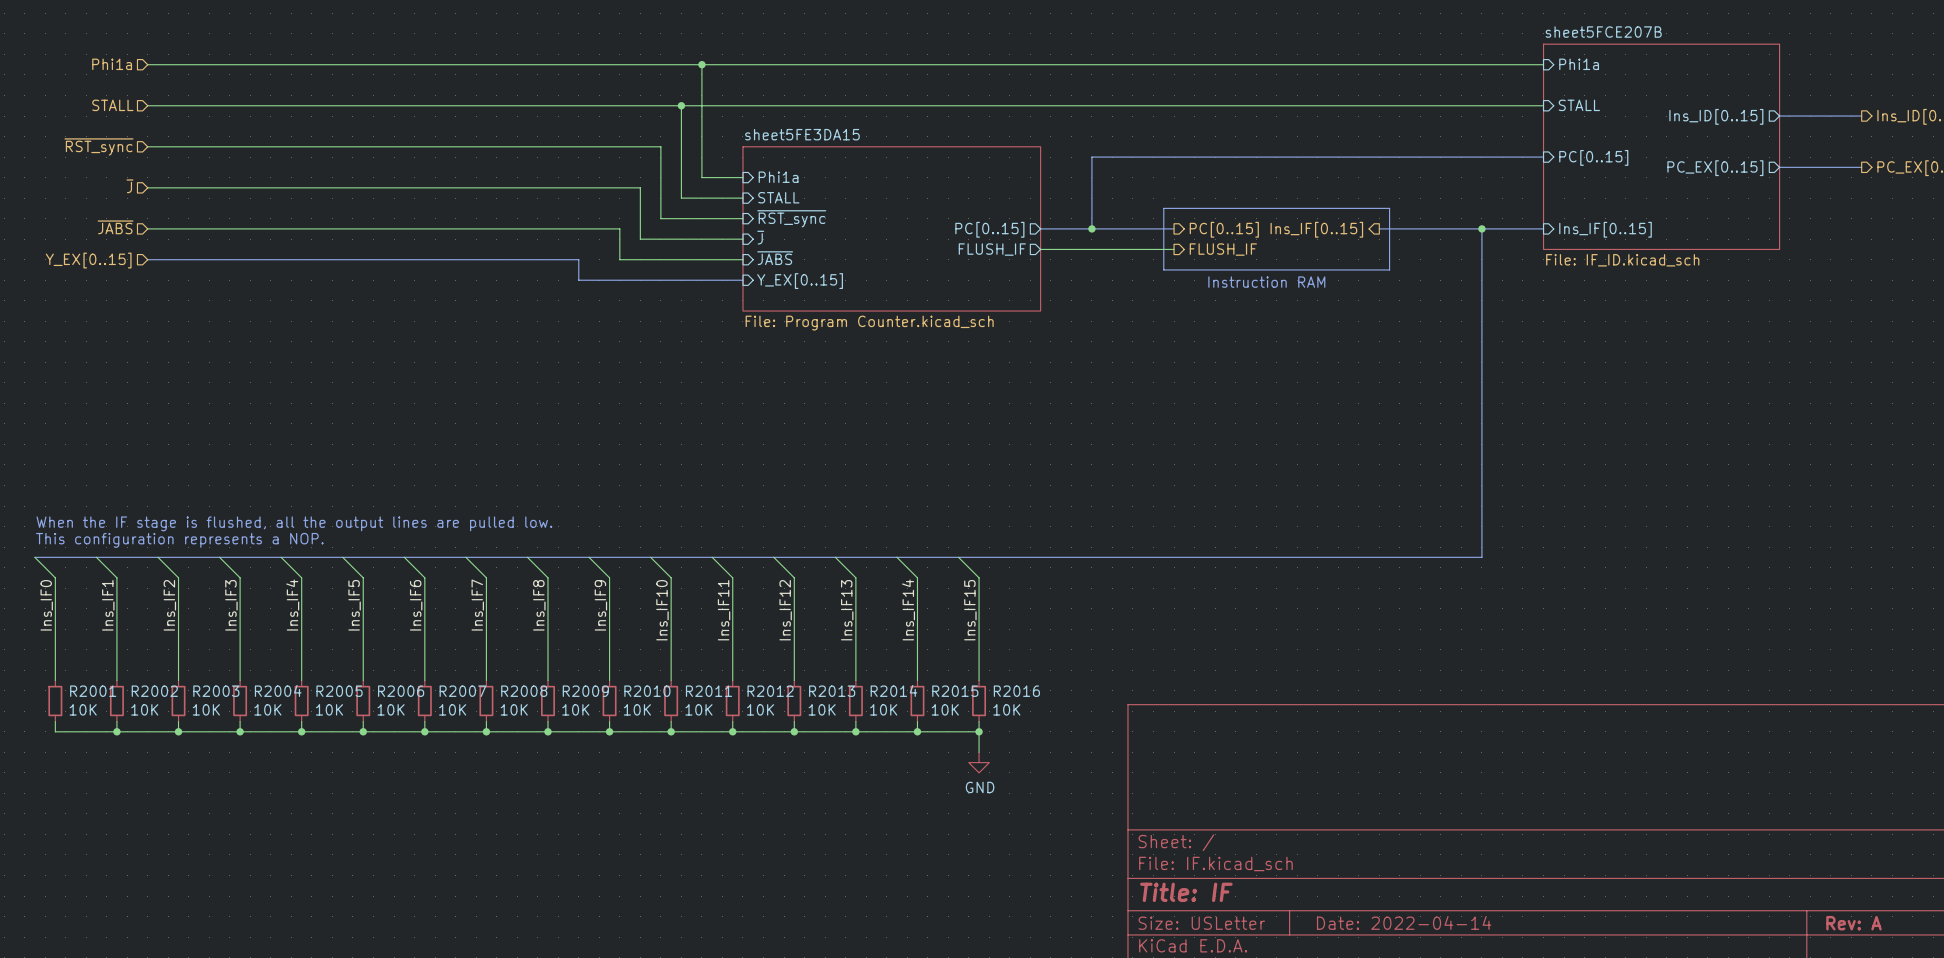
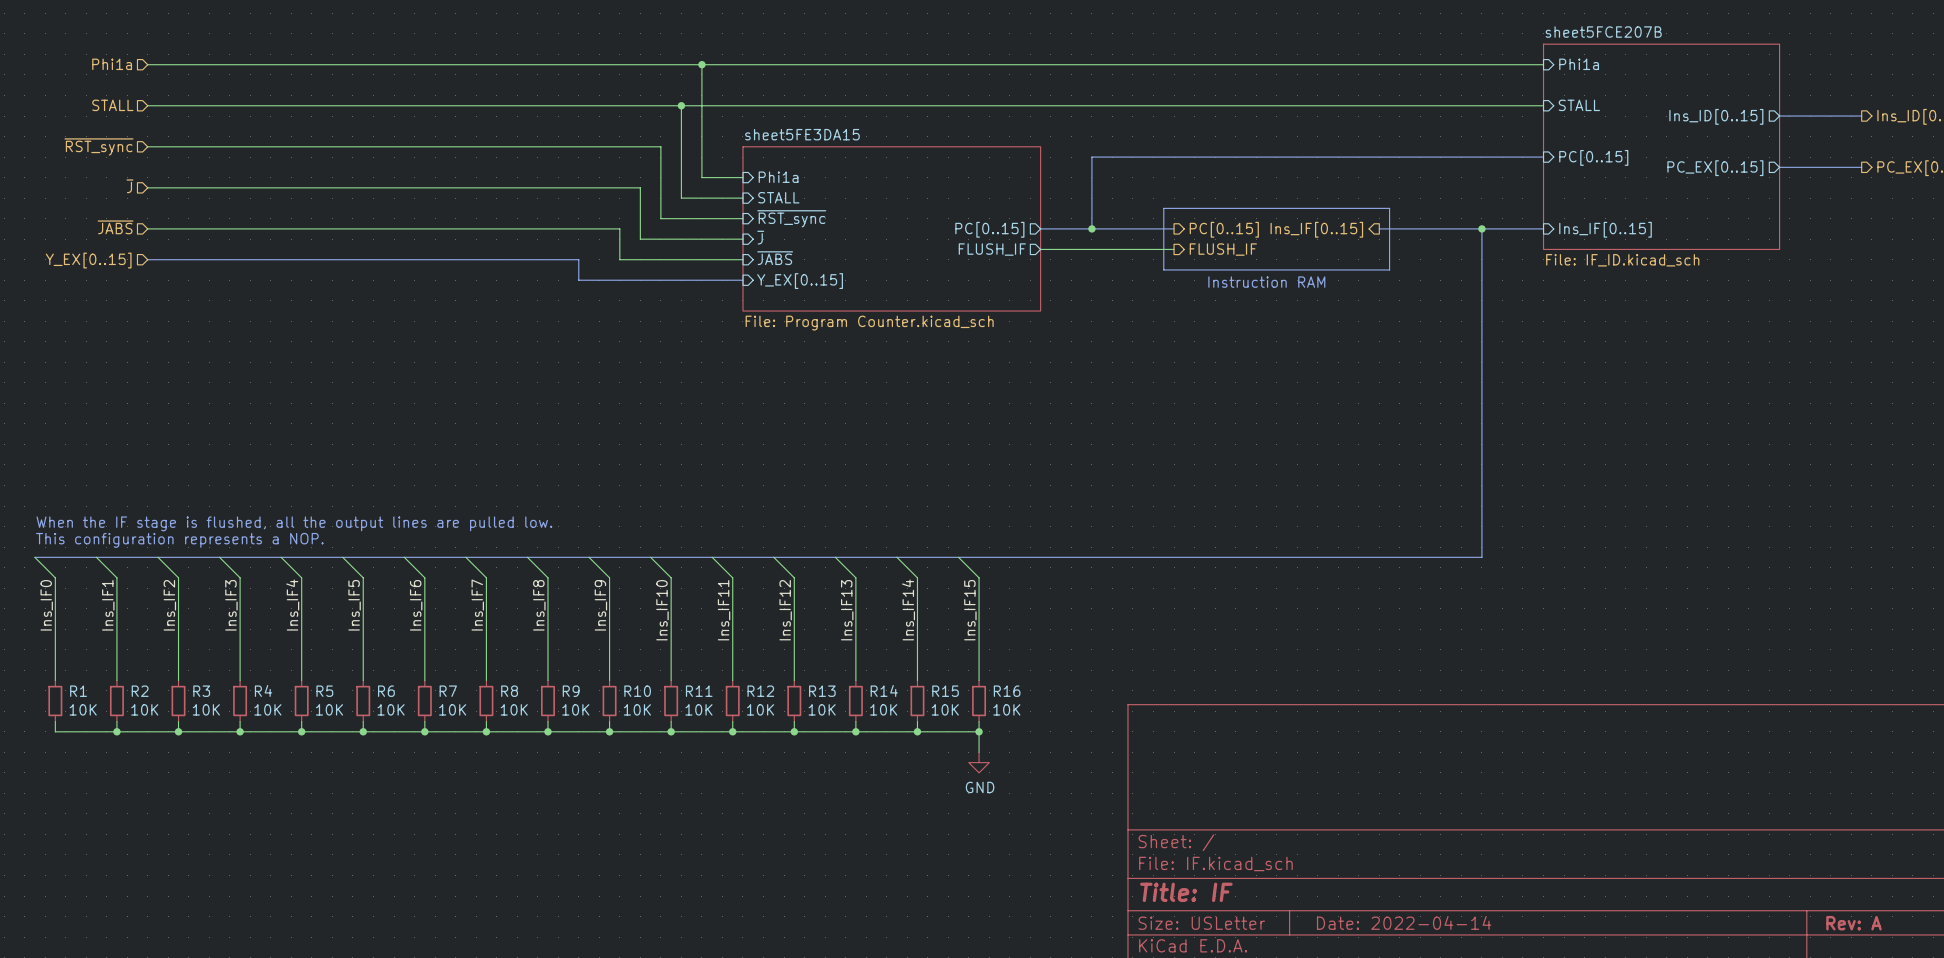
R2004 name: R2004 (278, 690) -> R4 (263, 690)
R2014 name: R2014 (893, 690) -> R14 (884, 690)
R2001 name: R2001 (93, 691) -> R1 (78, 691)
R2002 name: R2002 (154, 691) -> R2 (140, 691)
R2003 name: R2003 (216, 691) -> R3 (201, 691)
R2005 name: R2005 (339, 691) -> R5 (324, 691)
R2006 name: R2006 (401, 691) -> R6 (386, 691)
R2007 name: R2007 (462, 691) -> R7 (448, 691)
R2008 name: R2008 (524, 691) -> R8 (509, 691)
R2009 name: R2009 (585, 691) -> R9 (571, 691)
R2010 name: R2010 (647, 691) -> R10 (637, 691)
R2011 name: R2011 (708, 691) -> R11 (699, 691)
R2012 name: R2012 (770, 691) -> R12 (760, 691)
R2013 name: R2013 (832, 691) -> R13 (822, 691)
R2015 name: R2015 (955, 691) -> R15 (945, 691)
R2016 name: R2016 (1016, 691) -> R16 (1007, 691)

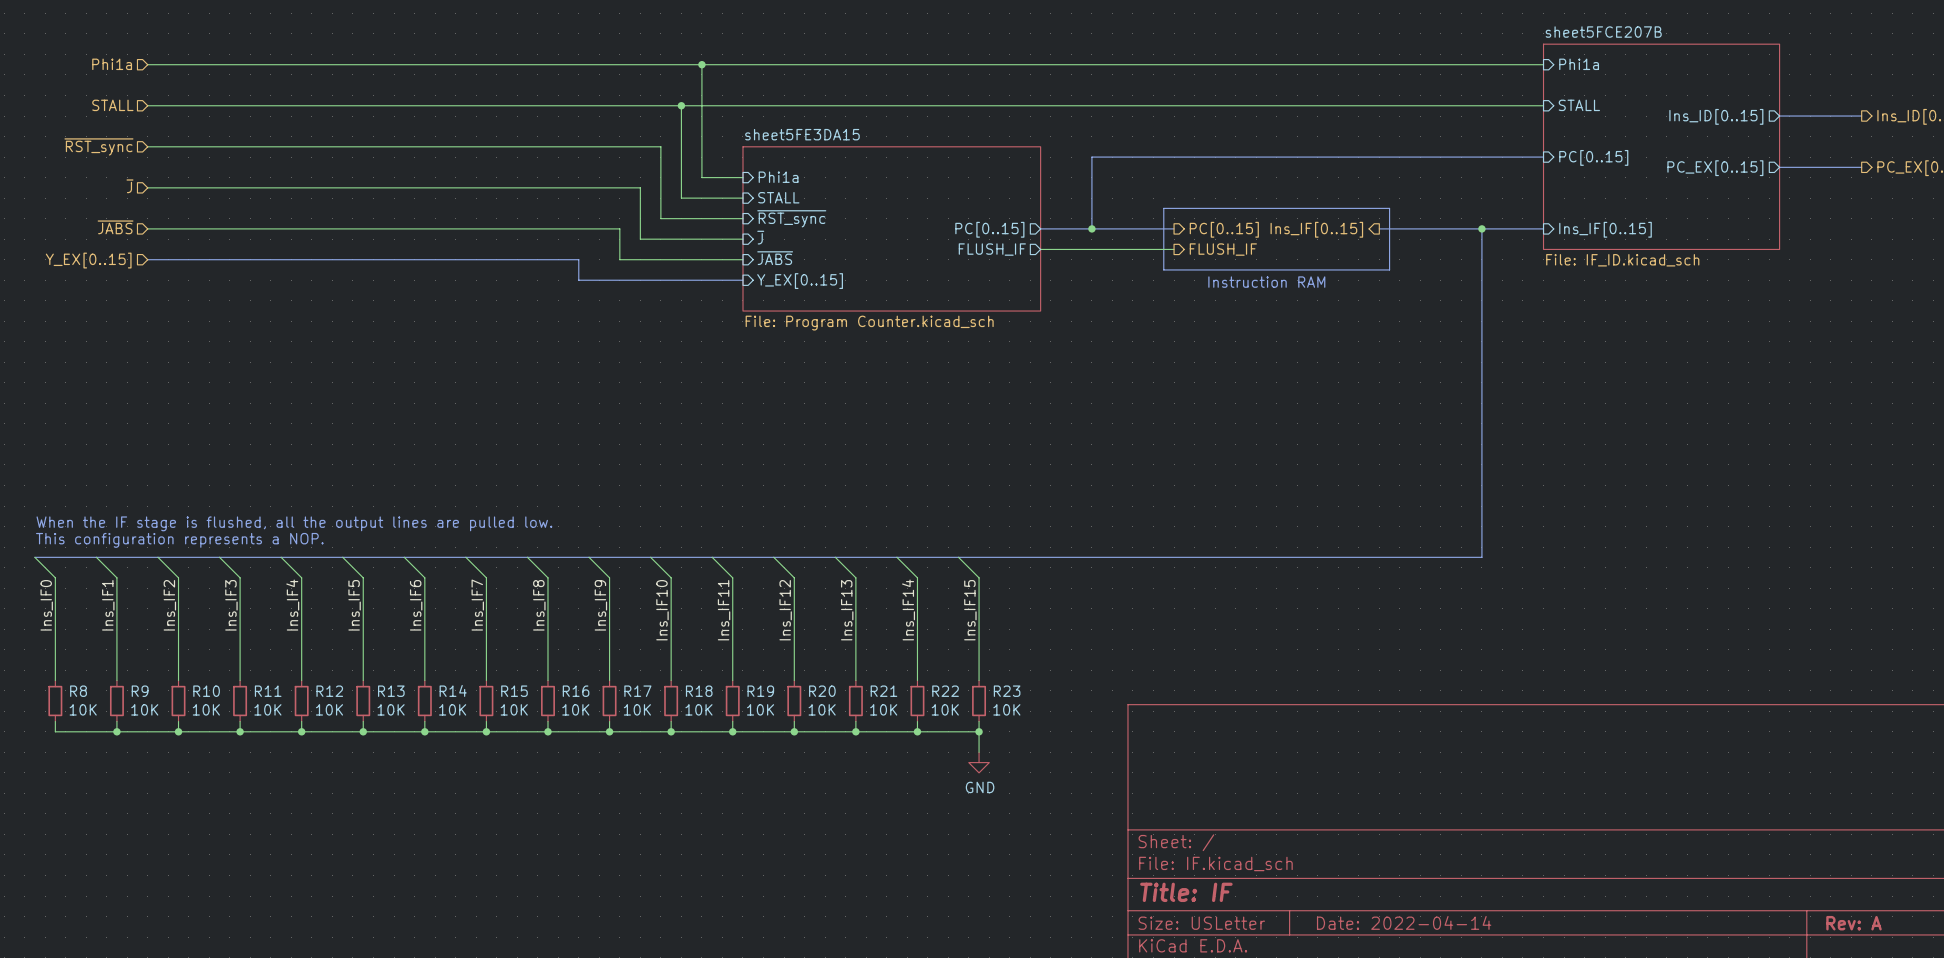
R4 name: R4 (263, 690) -> R11 (268, 691)
R14 name: R14 (884, 690) -> R21 (883, 691)
R1 name: R1 (78, 691) -> R8 (78, 691)
R2 name: R2 (140, 691) -> R9 (140, 691)
R3 name: R3 (201, 691) -> R10 (206, 691)
R5 name: R5 (324, 691) -> R12 (329, 691)
R6 name: R6 (386, 691) -> R13 (391, 691)
R7 name: R7 (448, 691) -> R14 (453, 690)
R8 name: R8 (509, 691) -> R15 (514, 691)
R9 name: R9 (571, 691) -> R16 (576, 691)
R10 name: R10 (637, 691) -> R17 (637, 691)
R11 name: R11 (699, 691) -> R18 (699, 691)
R12 name: R12 (760, 691) -> R19 (760, 691)
R13 name: R13 (822, 691) -> R20 (822, 691)
R15 name: R15 (945, 691) -> R22 (945, 691)
R16 name: R16 (1007, 691) -> R23 (1007, 691)

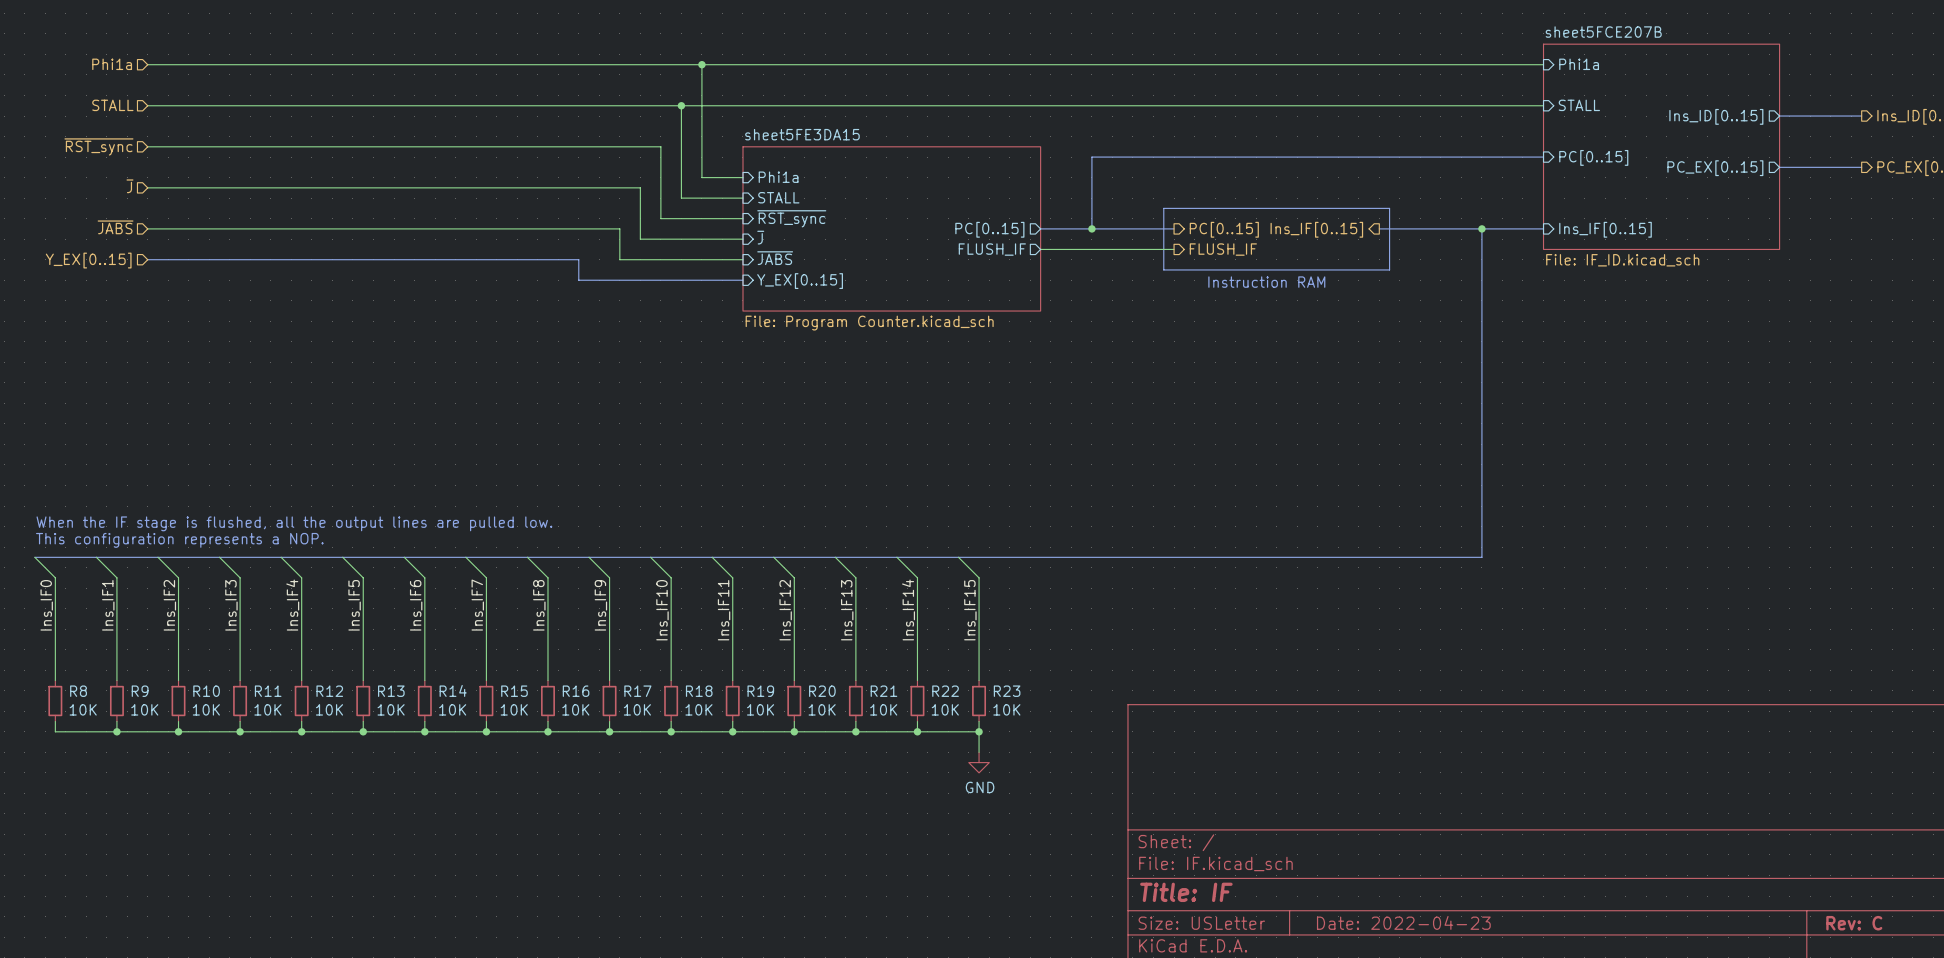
title block: Date: 2022-04-14 (1404, 922) -> Date: 2022-04-23 (1403, 922)
title block: Rev: A (1854, 923) -> Rev: C (1854, 923)

